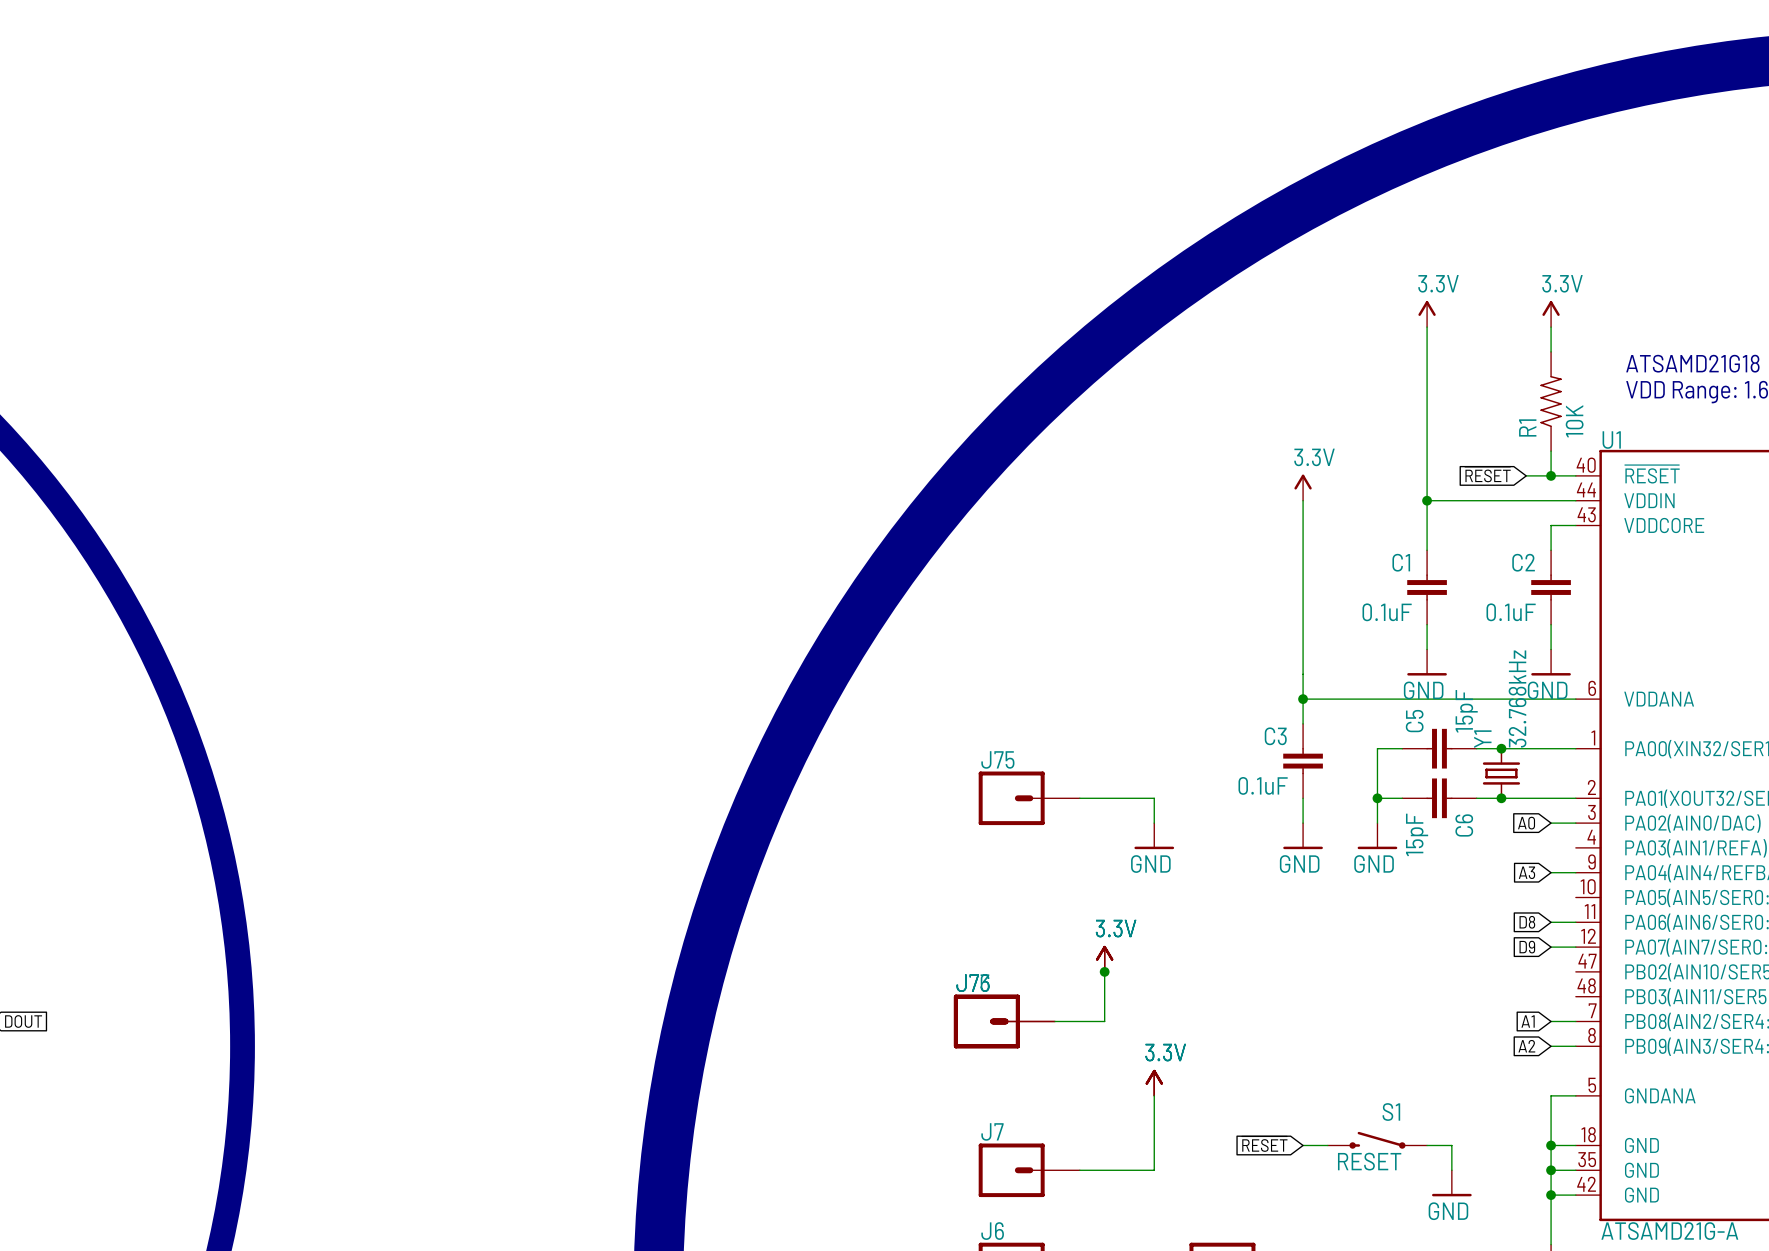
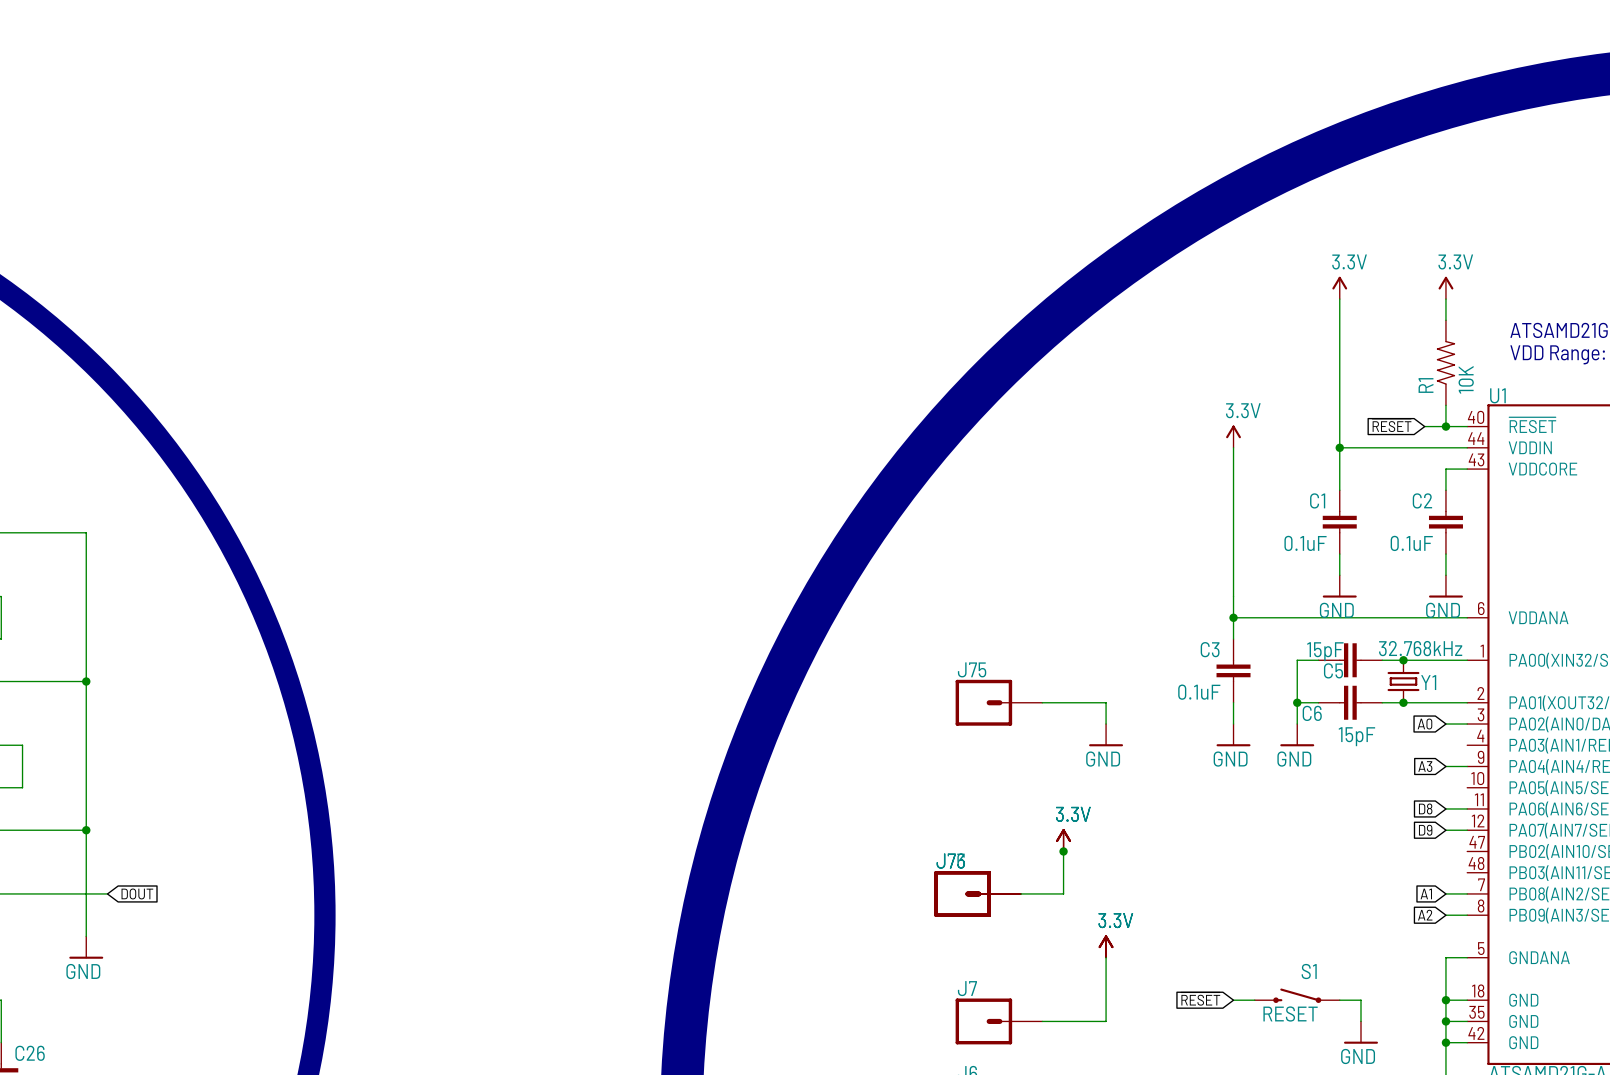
Y1 value rotation: 0° (1517, 699) -> 90° clockwise (1420, 648)
C5 value rotation: 0° (1466, 711) -> 90° clockwise (1325, 651)
C5 value position: 15pF (1466, 711) -> 15pF (1325, 651)
C5 name rotation: 0° (1414, 721) -> 90° clockwise (1333, 670)
C5 name position: C5 (1414, 721) -> C5 (1333, 670)
Y1 name rotation: 0° (1482, 739) -> 90° clockwise (1428, 682)
Y1 name position: Y1 (1482, 739) -> Y1 (1428, 682)
C6 name rotation: 0° (1464, 825) -> 90° clockwise (1312, 713)
C6 name position: C6 (1464, 825) -> C6 (1312, 713)
C6 value rotation: 0° (1417, 834) -> 90° clockwise (1356, 736)

